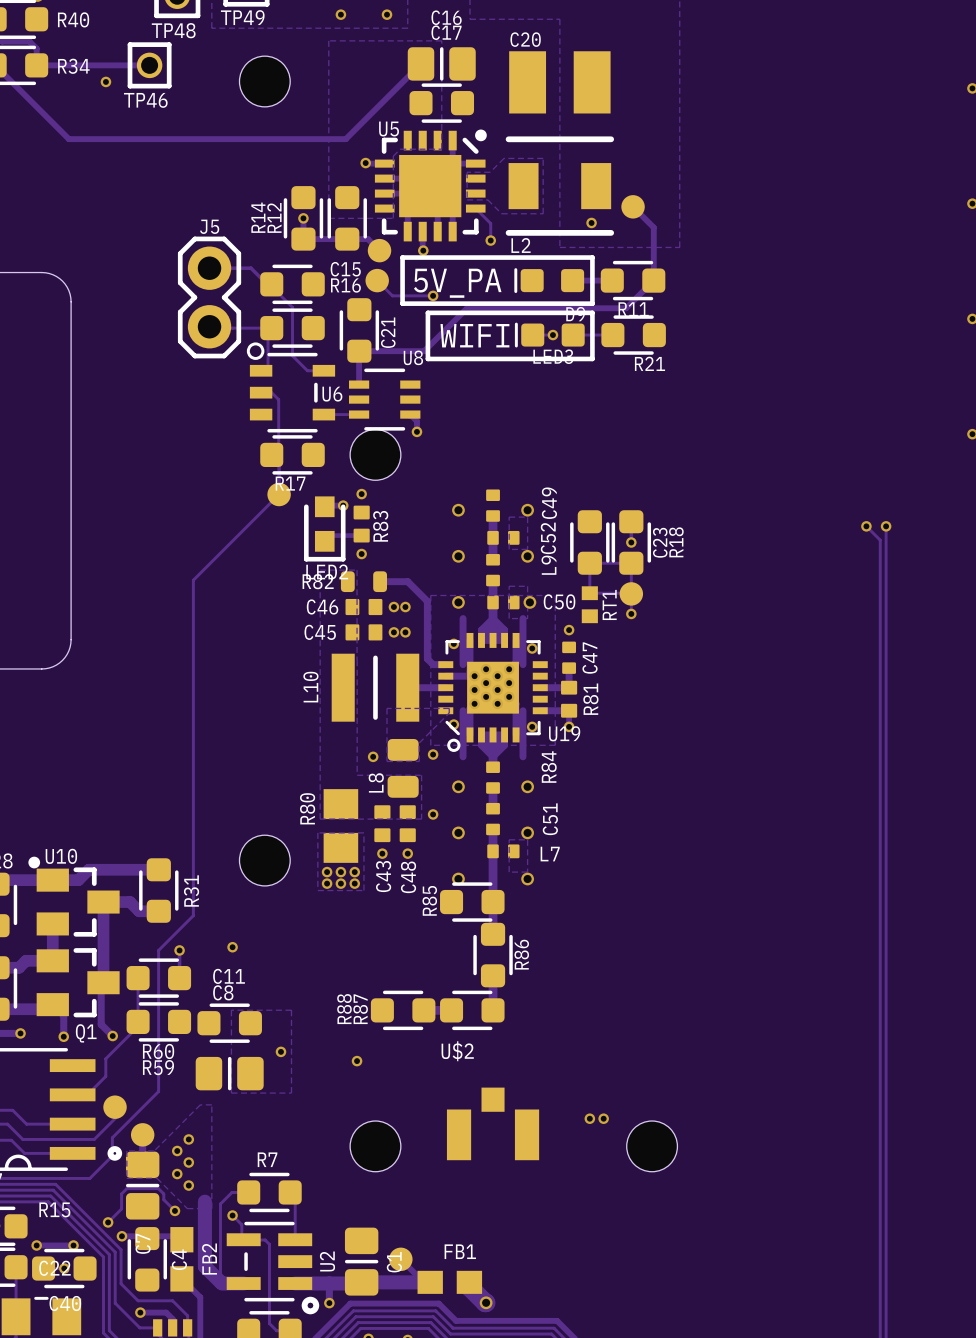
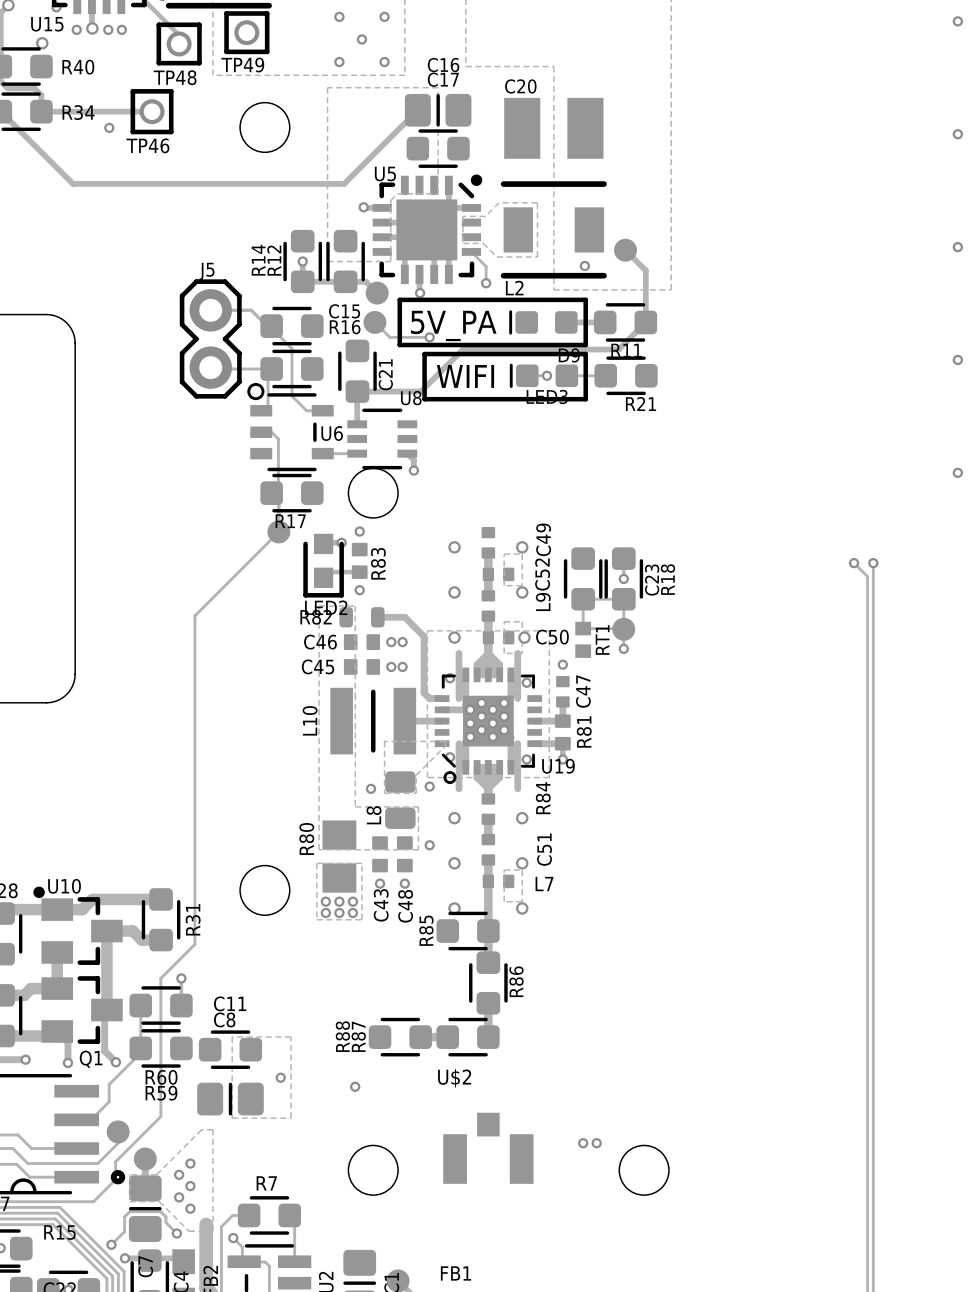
via: (232, 947) -> none
track: (36, 1245) (73, 1245) -> none
via: (36, 1245) -> none
via: (73, 1245) -> none

